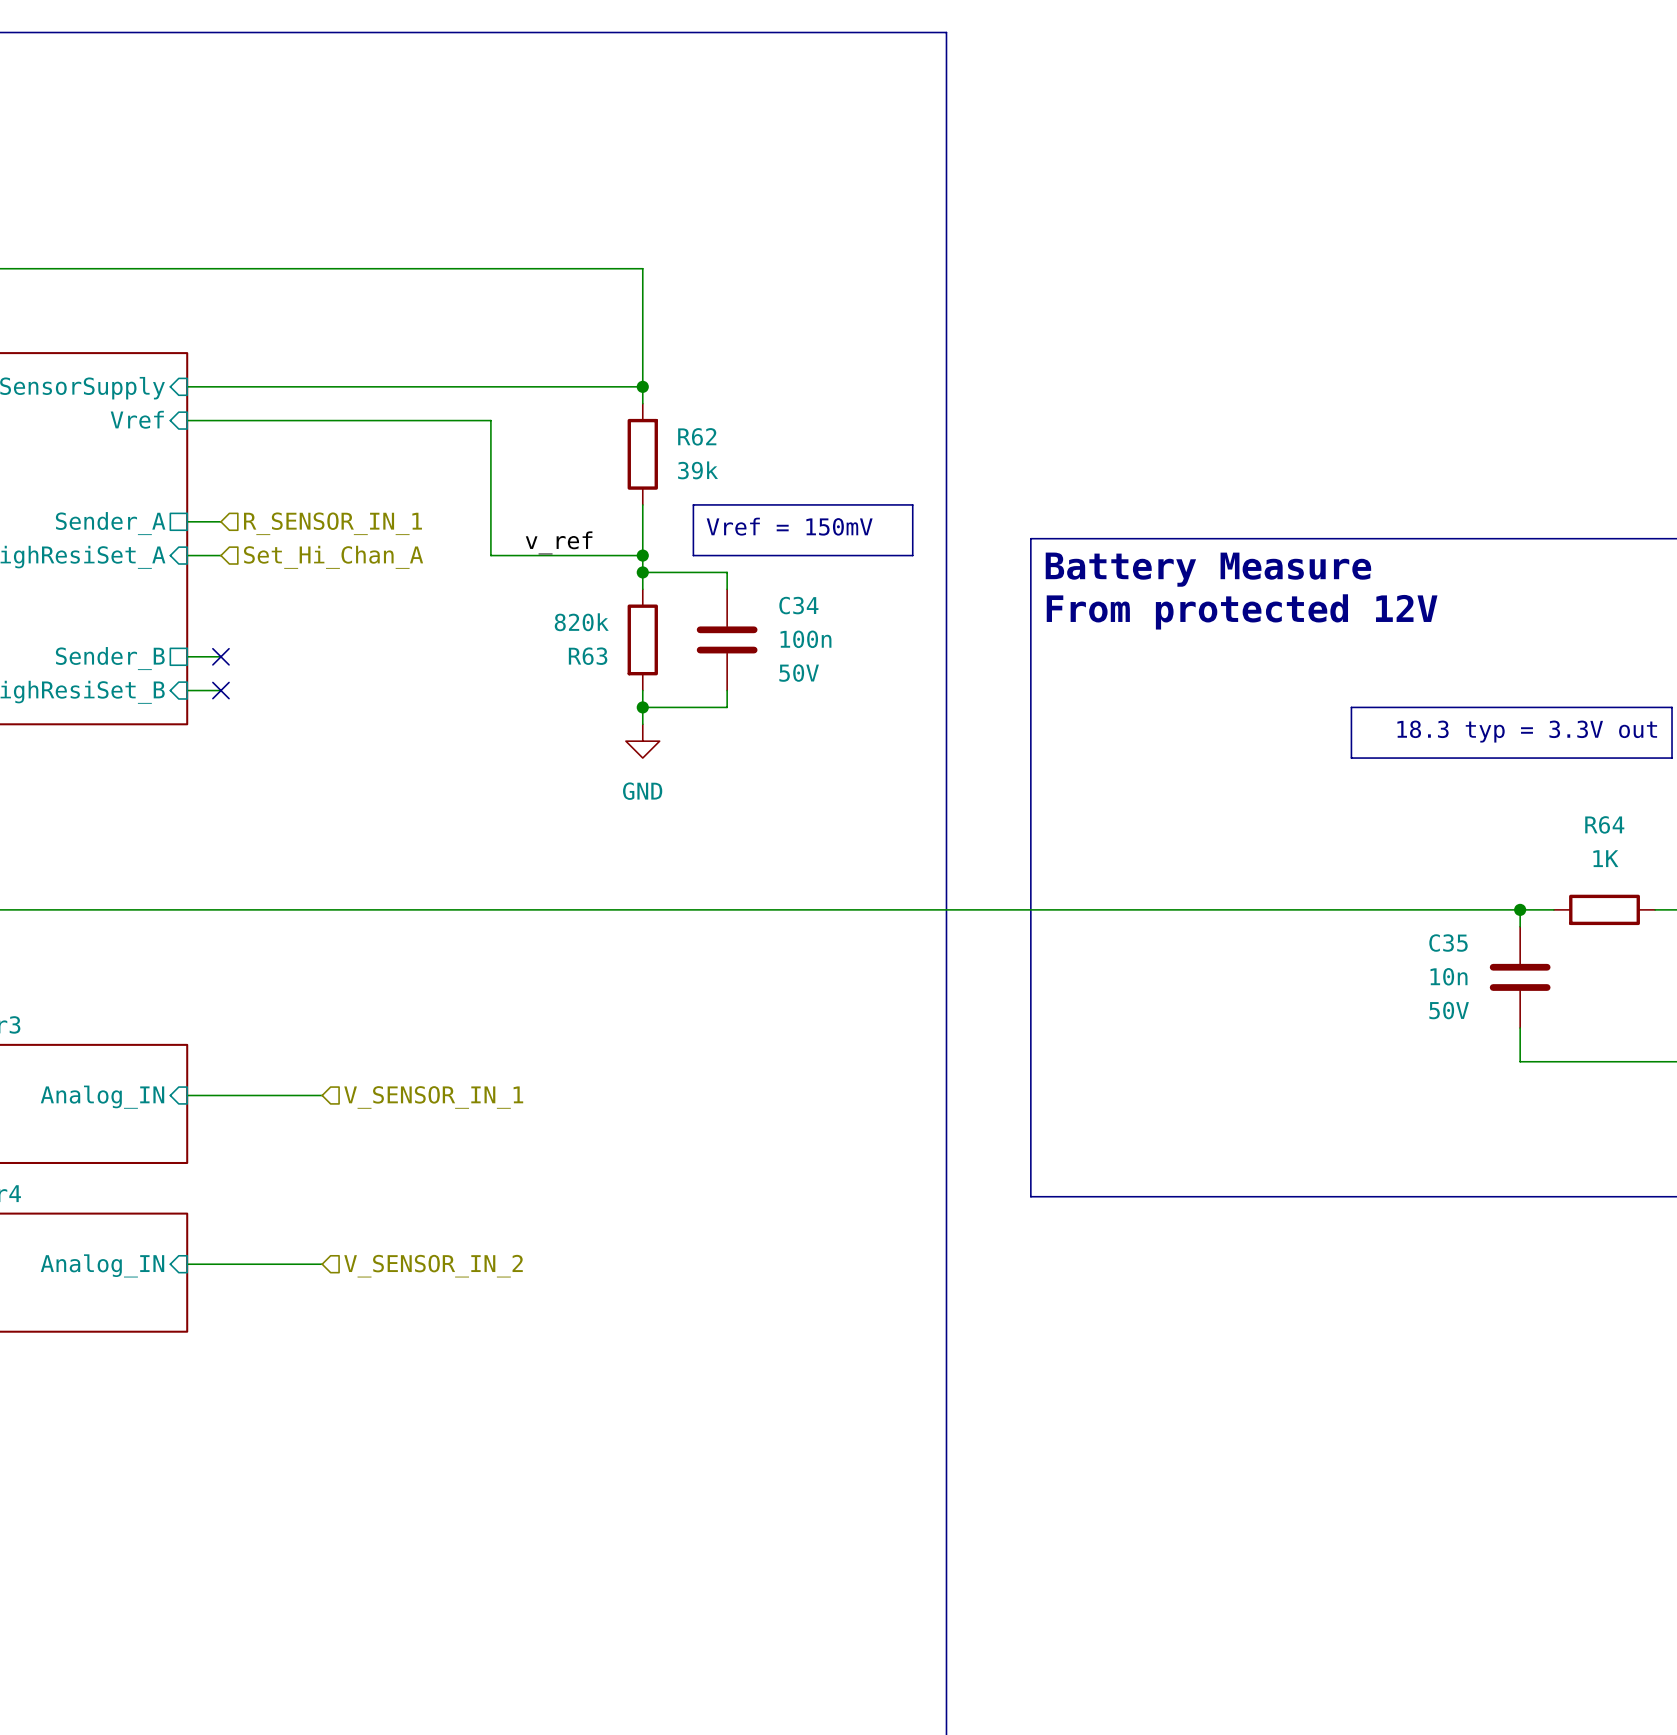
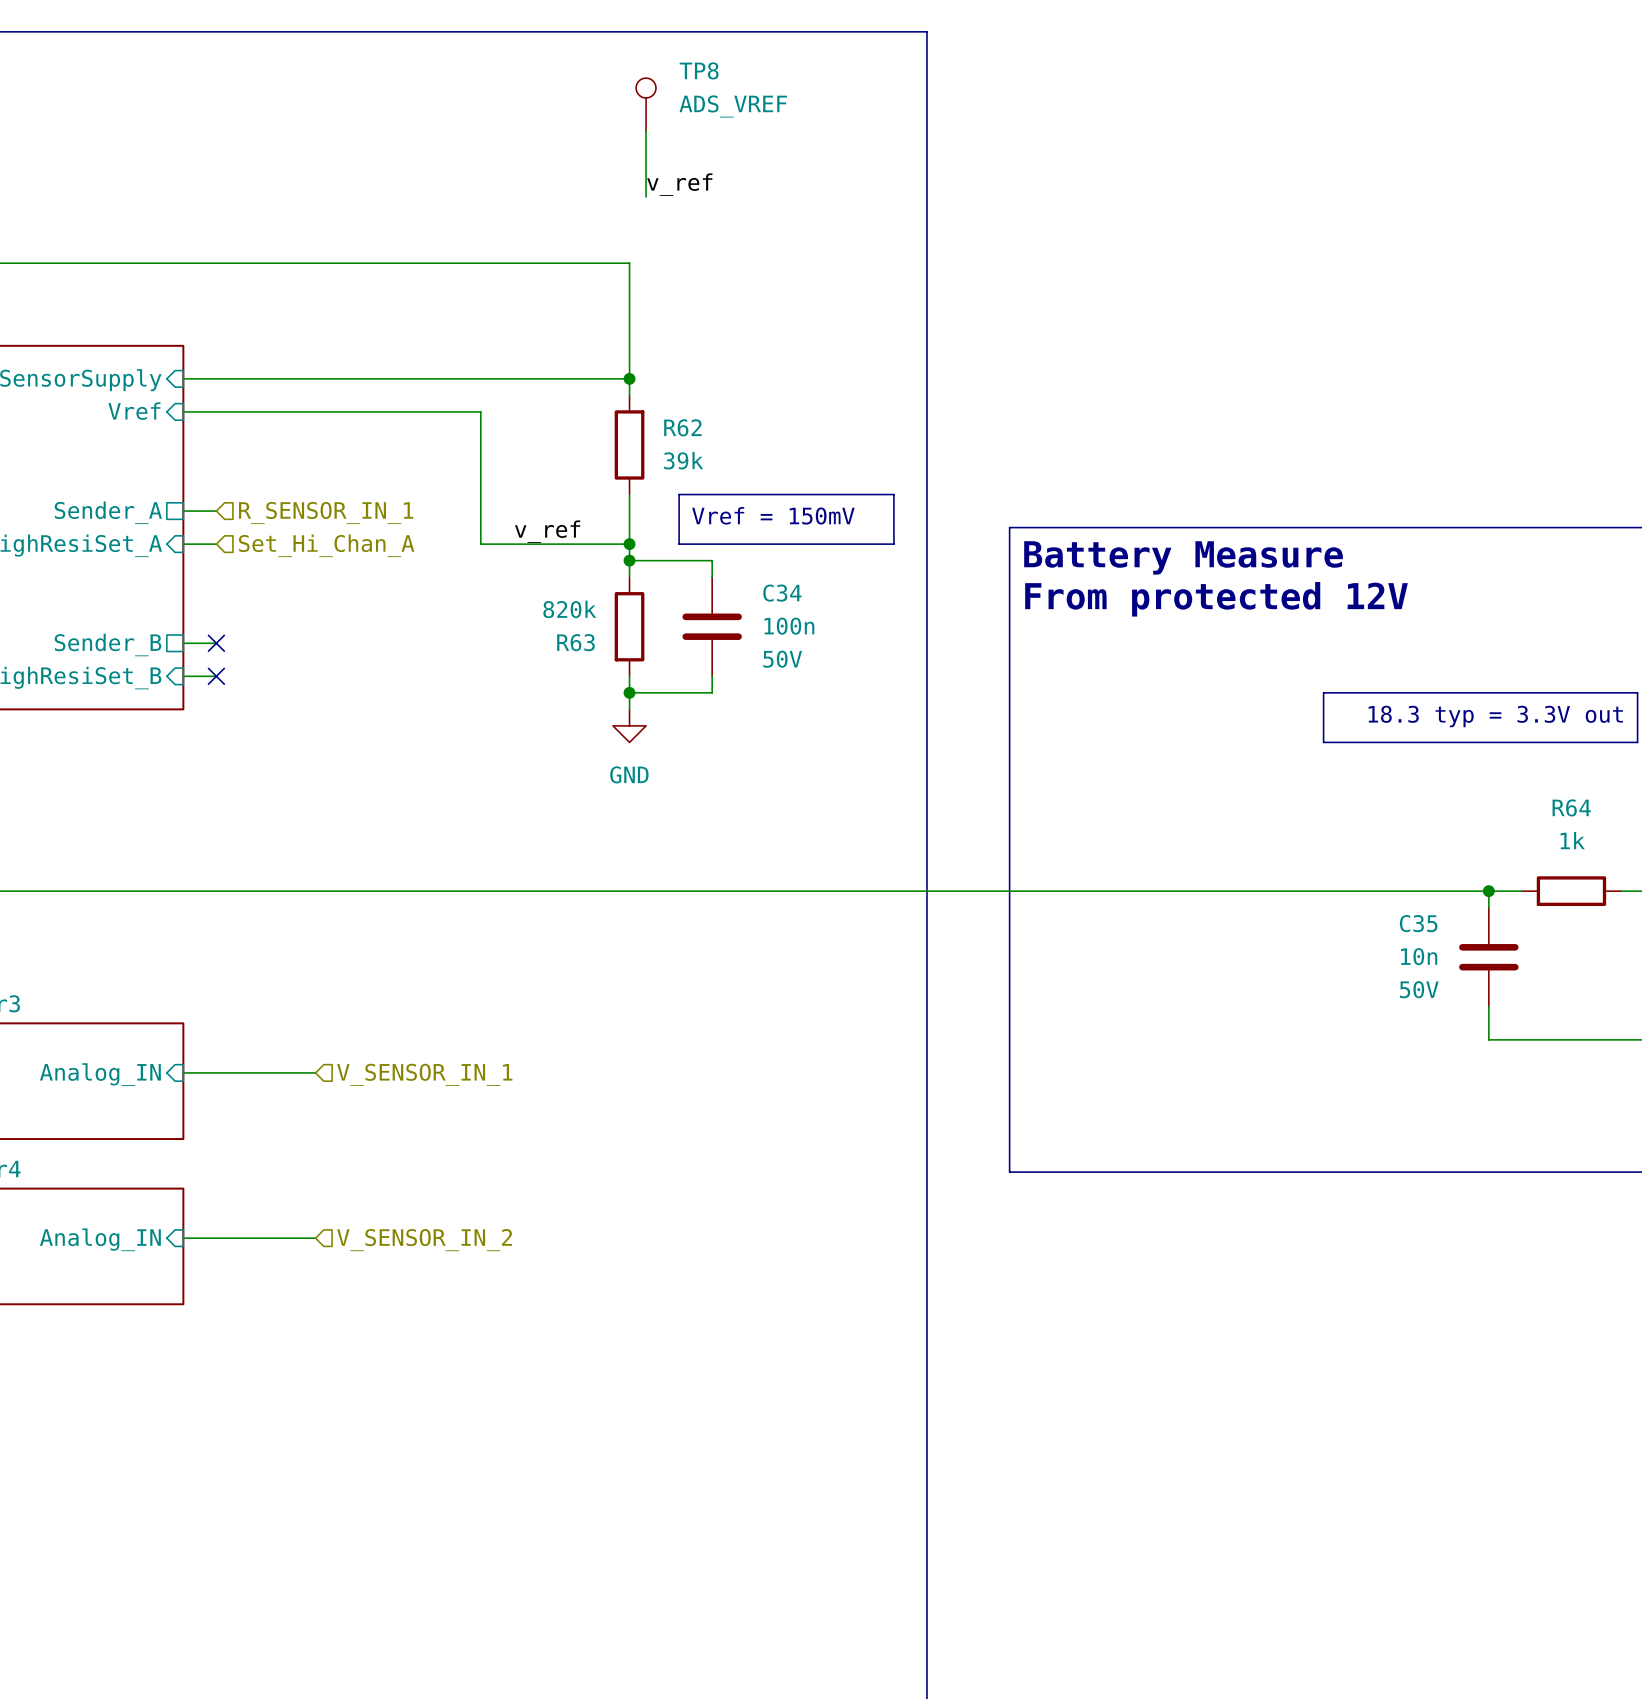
TP8: none -> ADS_VREF (646, 104)
wire: none -> (646, 130) (646, 197)
label: none -> v_ref (679, 184)
R64 value: 1K (1605, 858) -> 1k (1572, 840)

